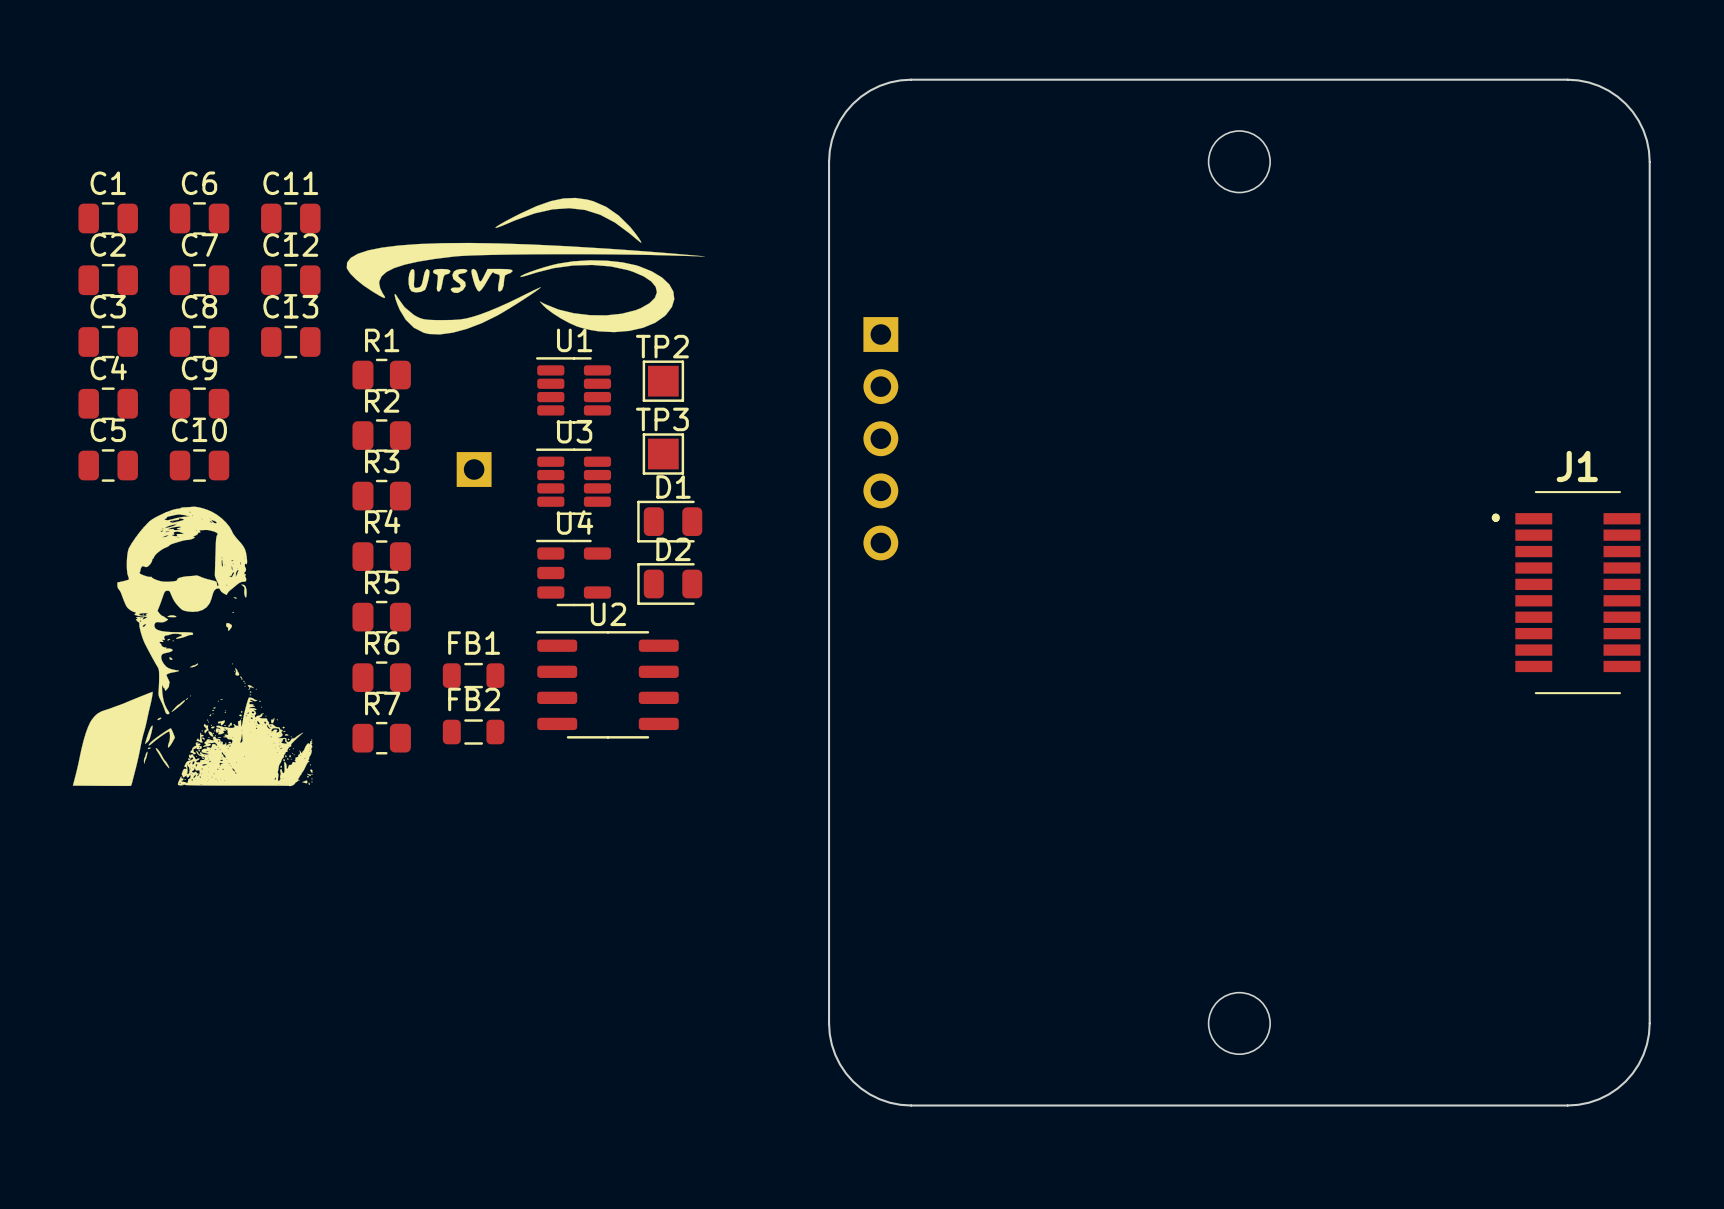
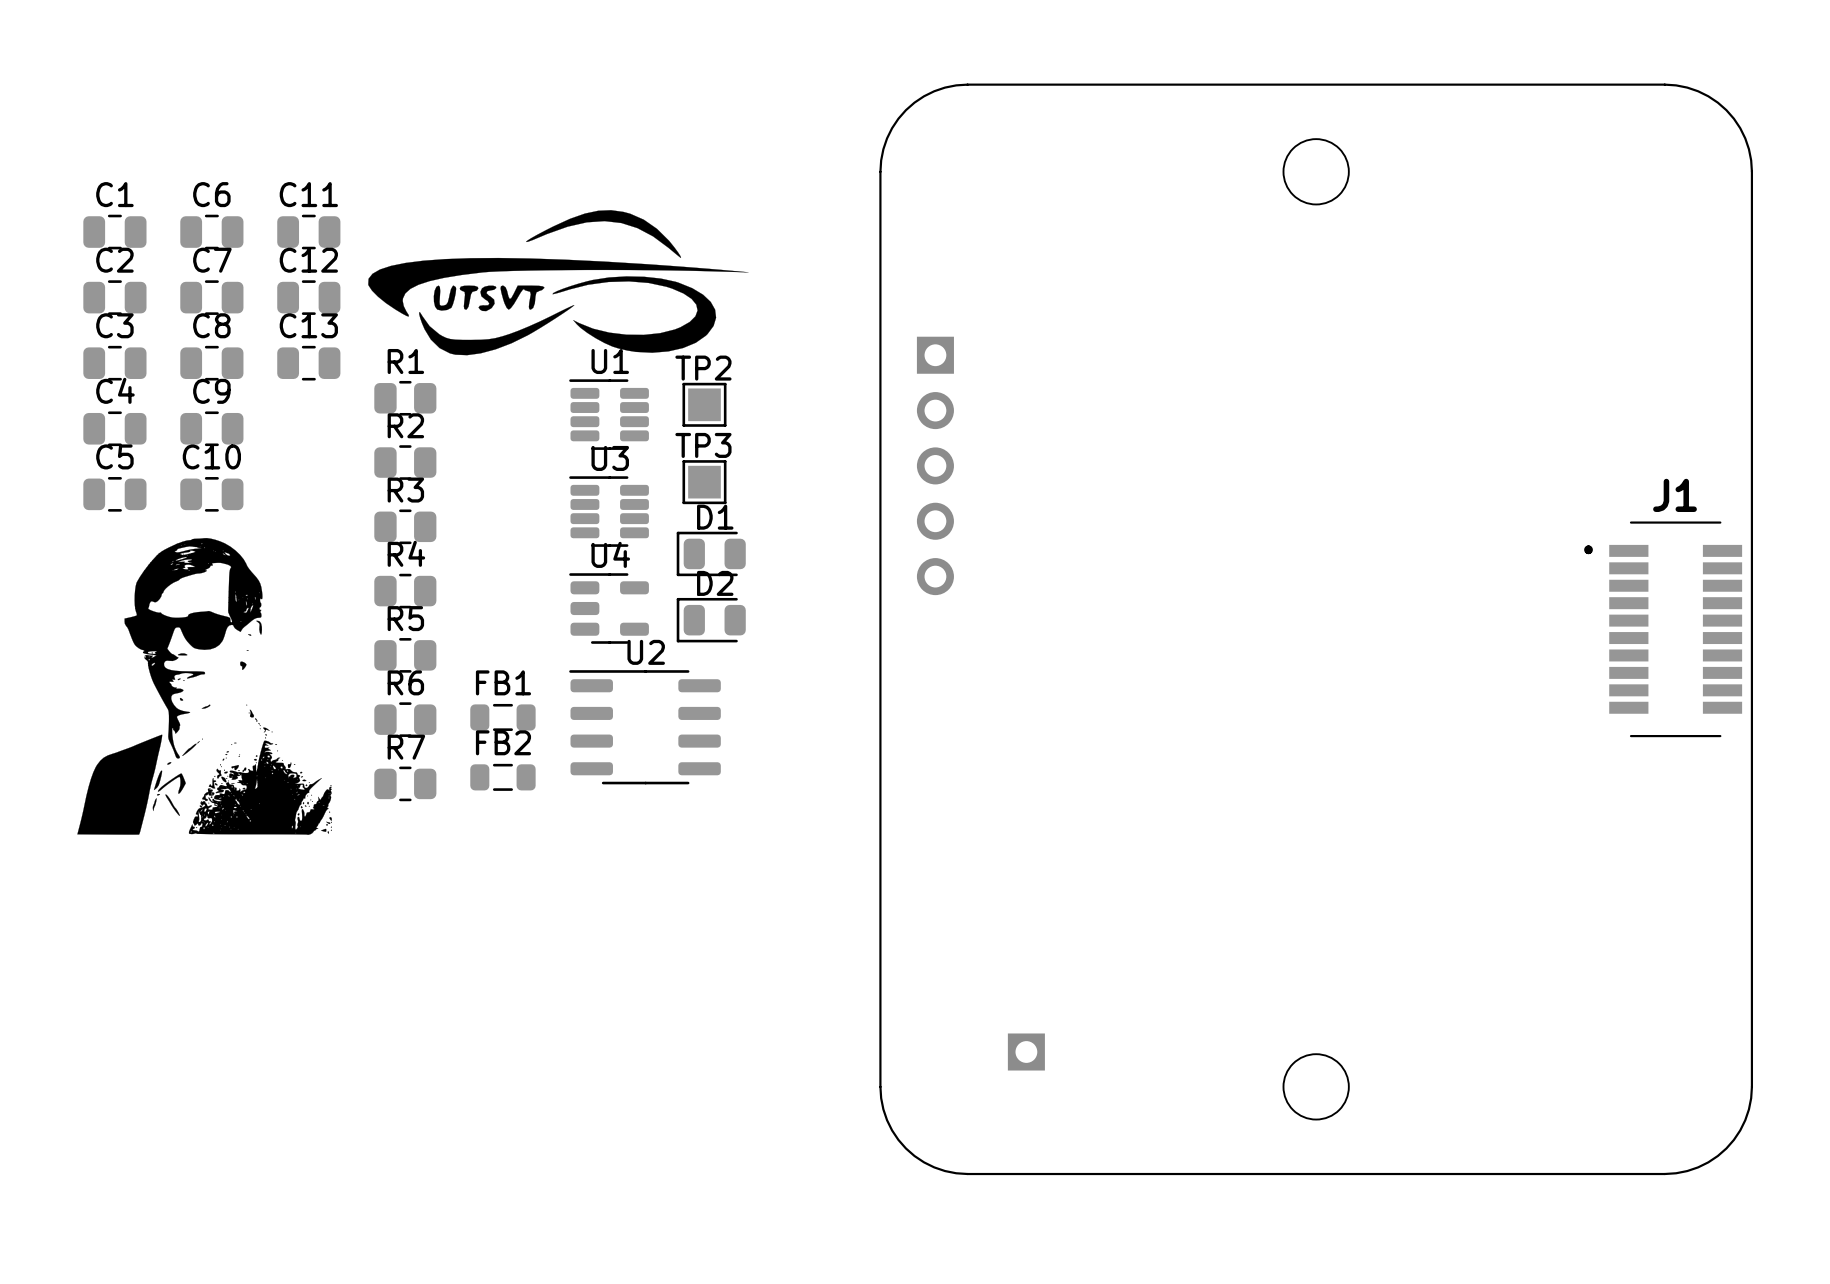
part: (474, 469) -> none
part: none -> (1026, 1052)

